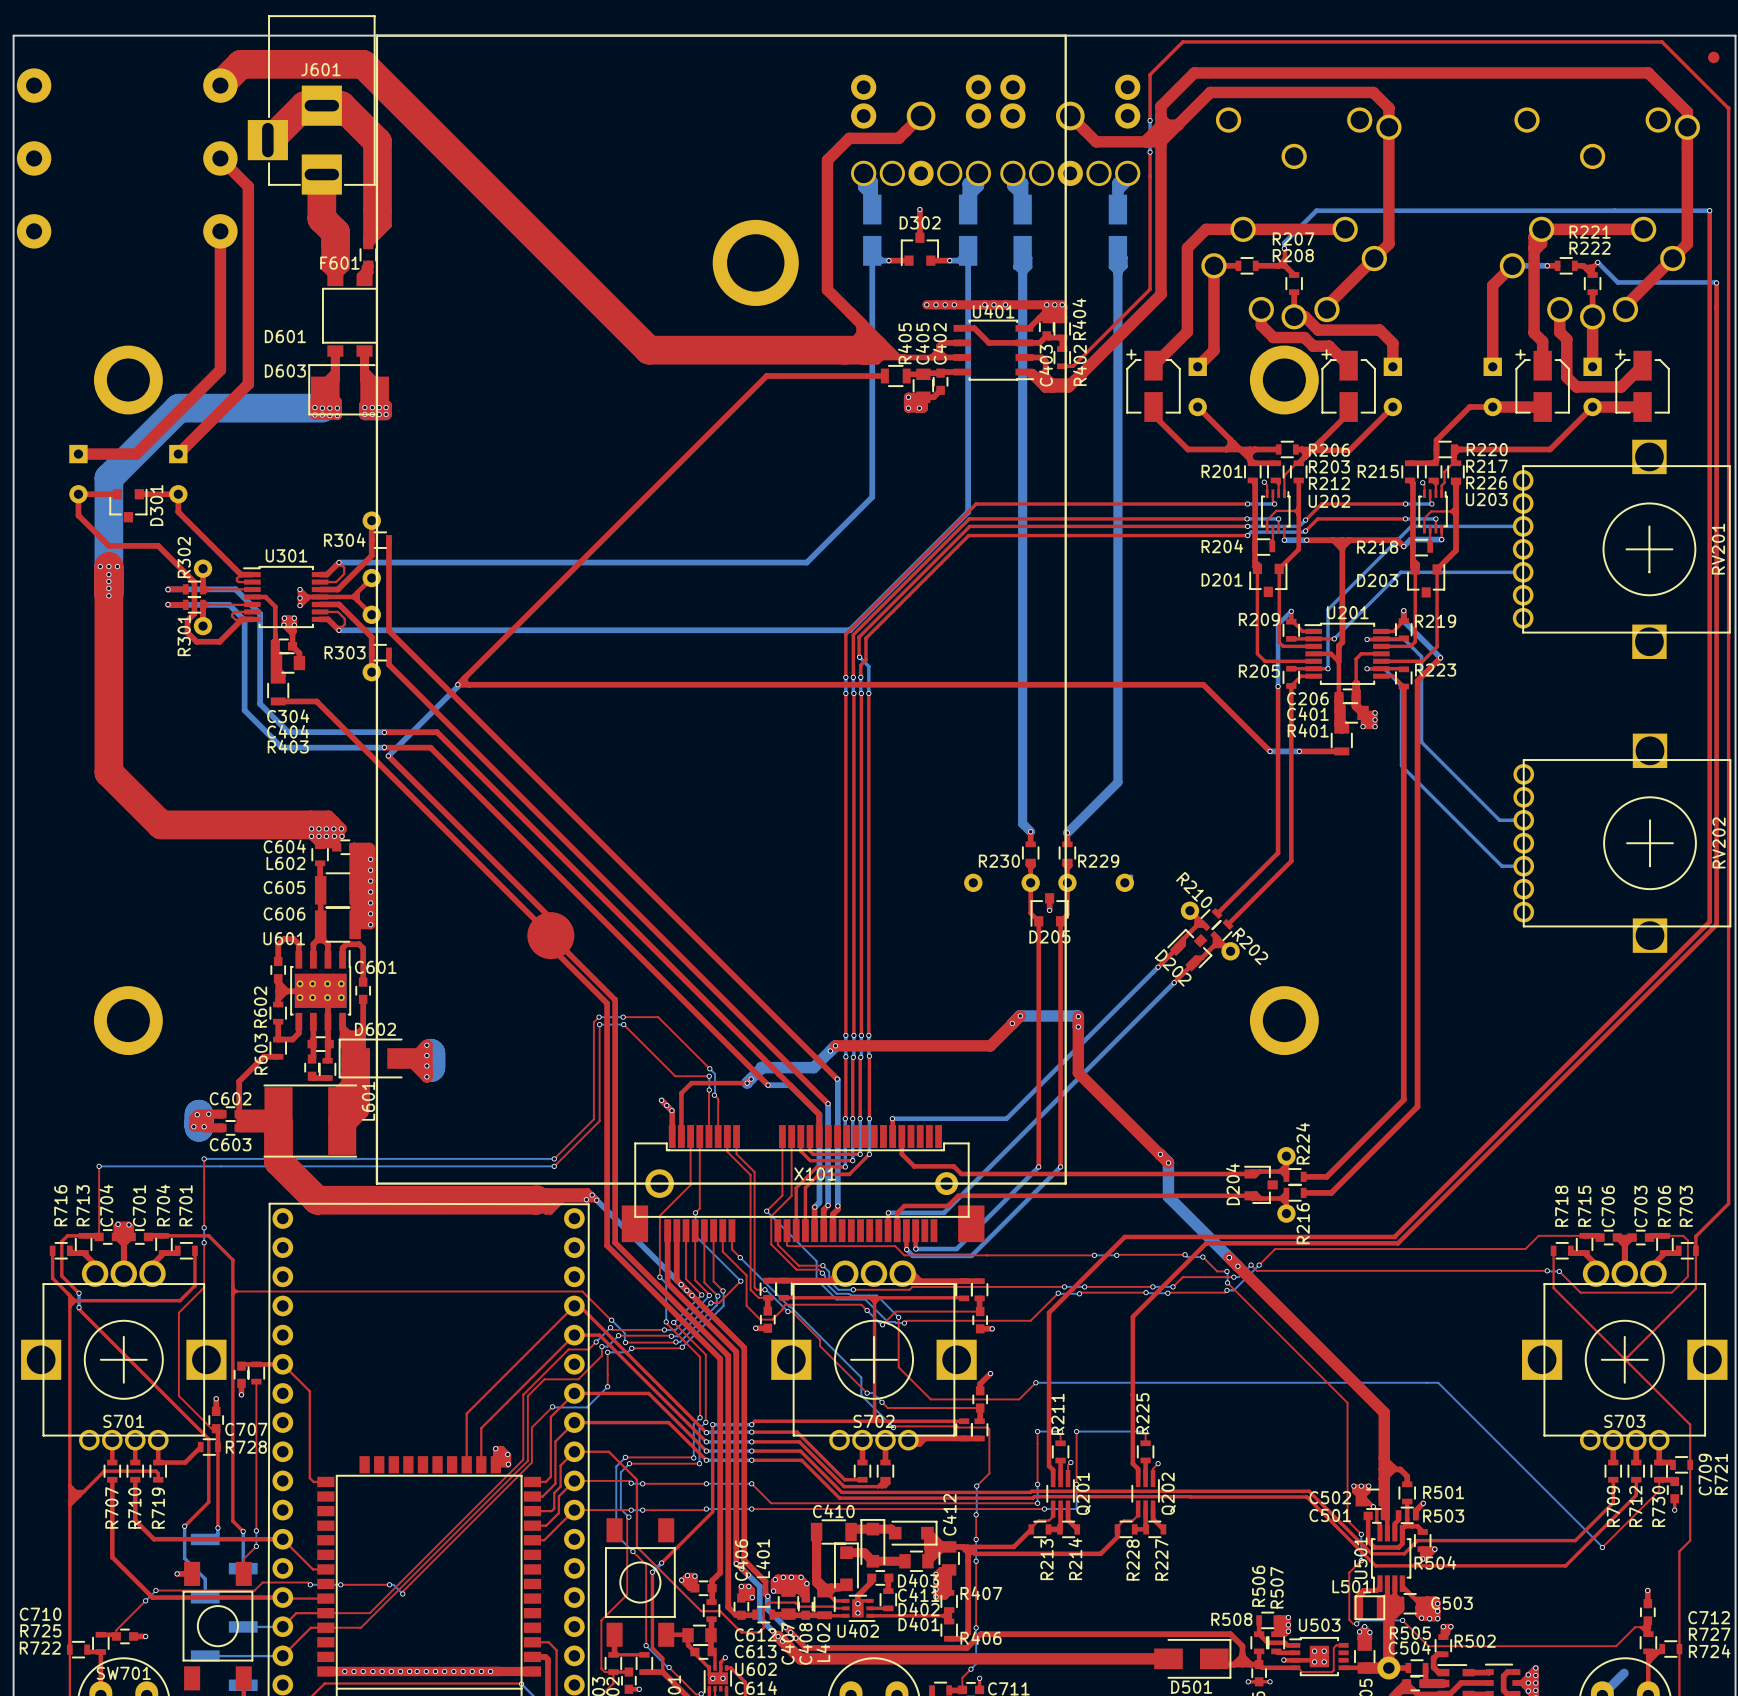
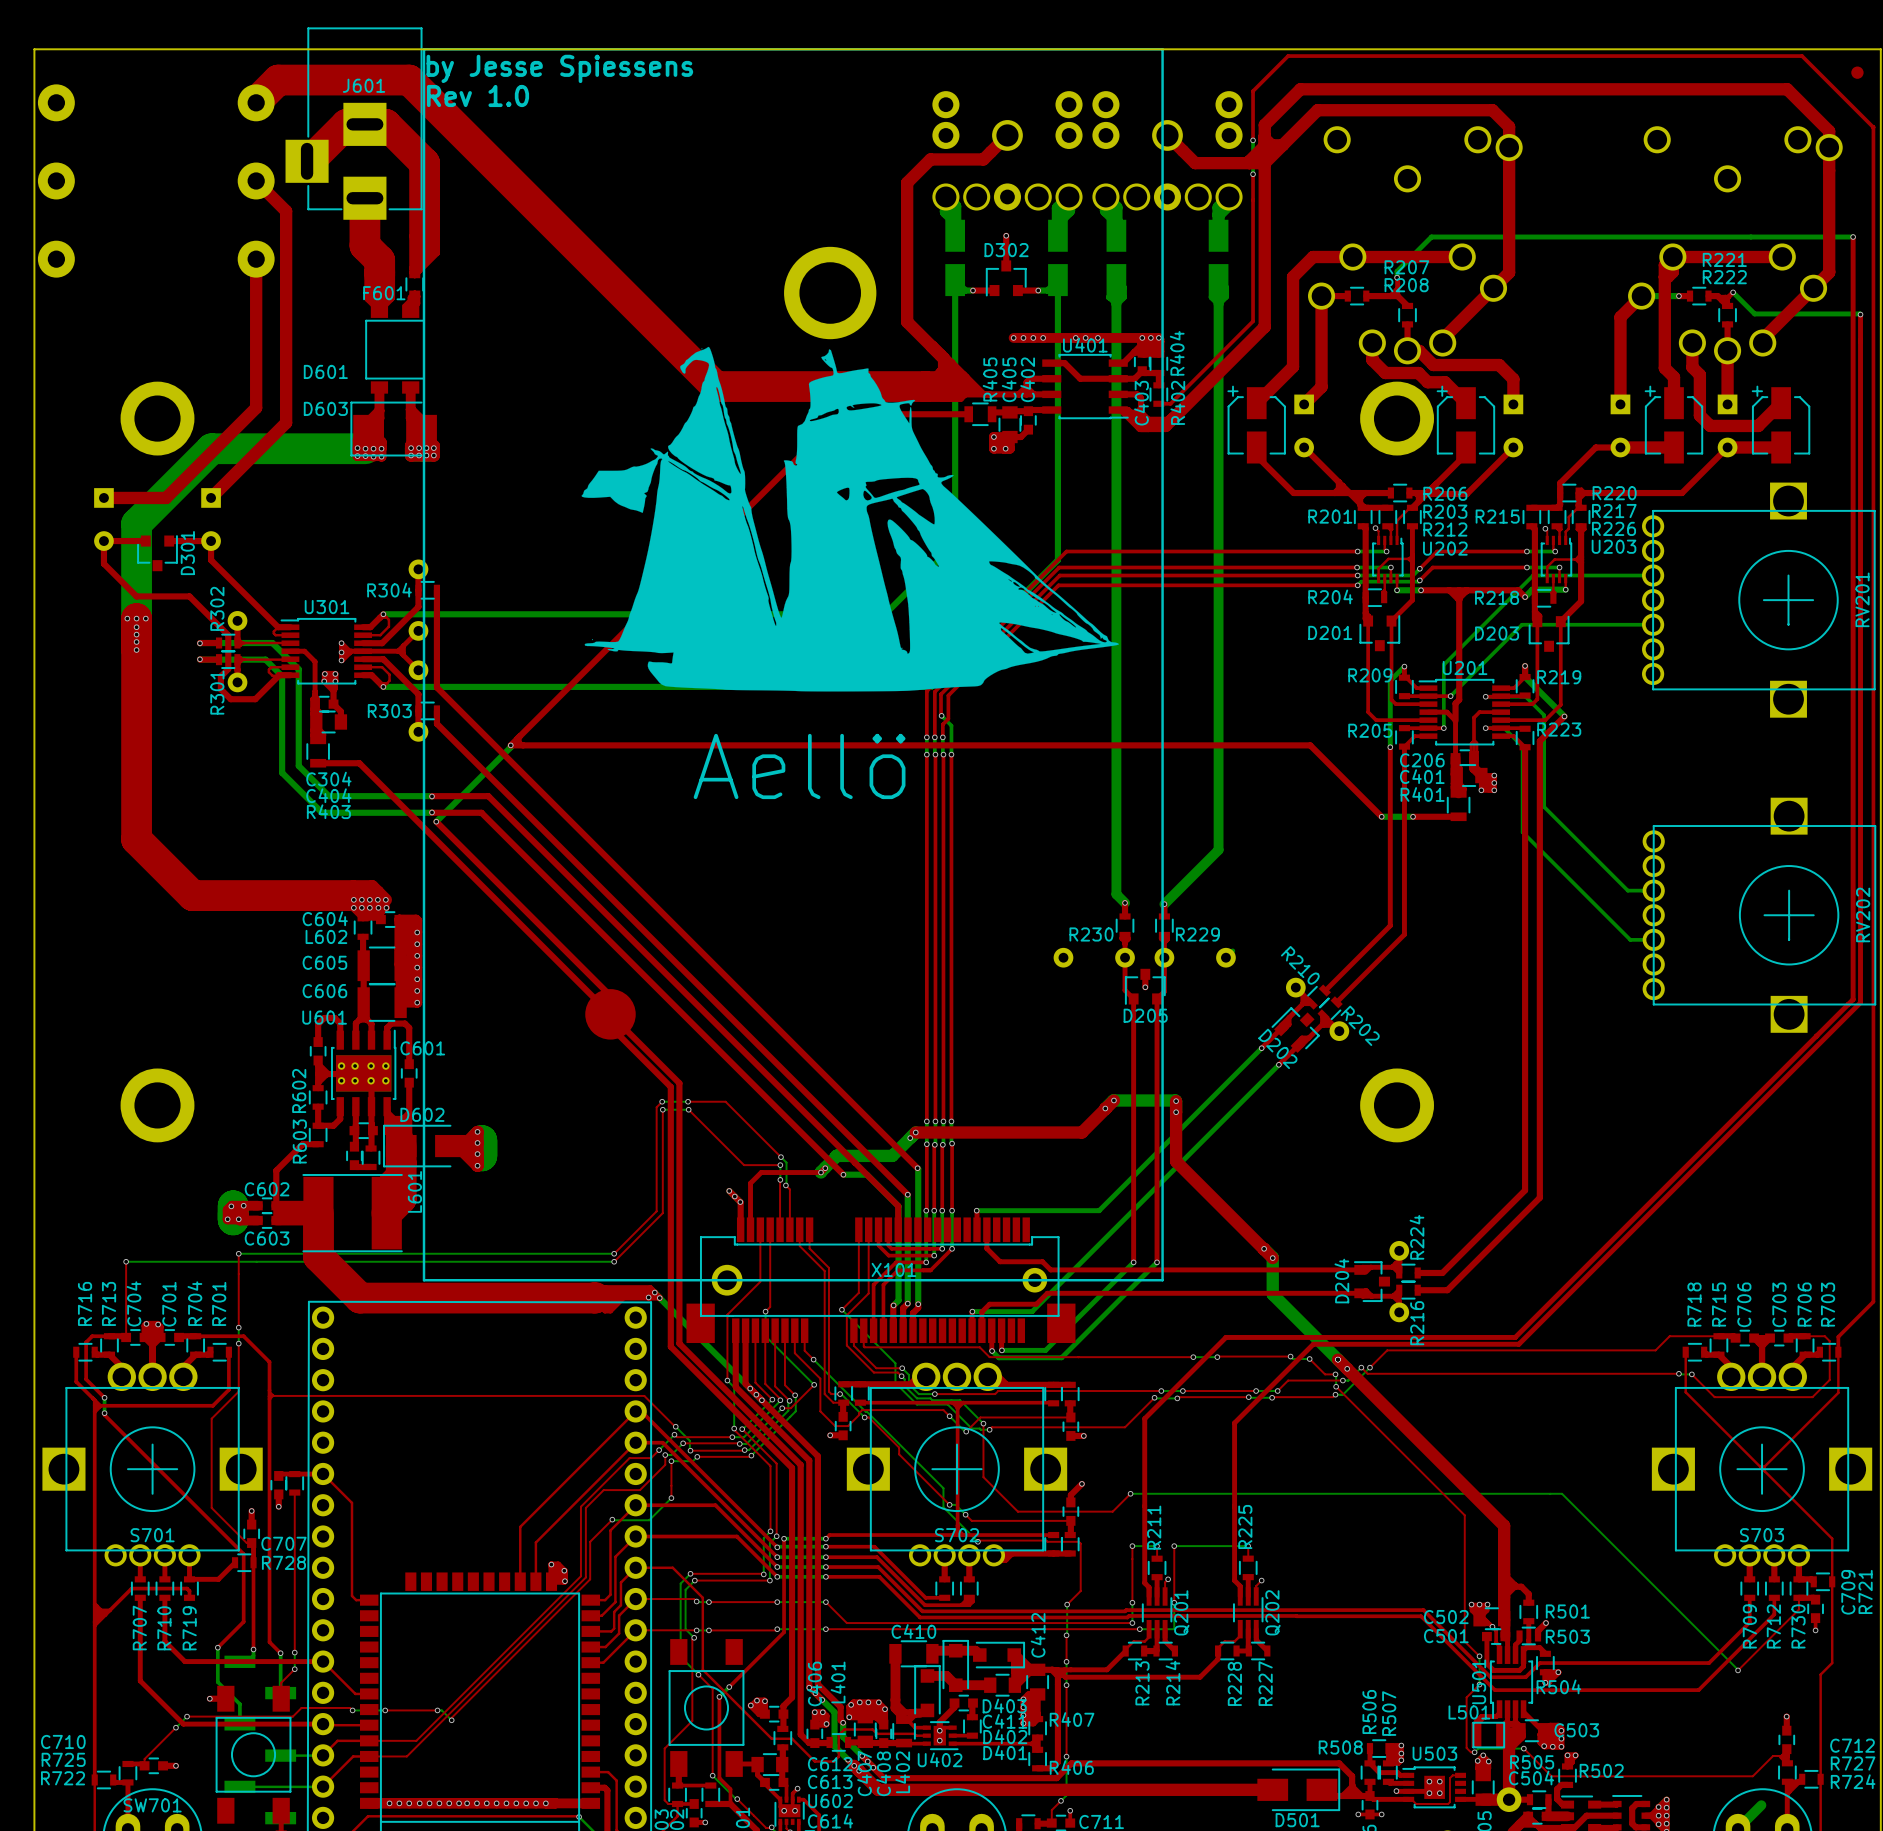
text: none -> by Jesse Spiessens (559, 68)
text: none -> Rev 1.0 (477, 95)
drawing: none -> [581, 346, 1119, 692]
text: none -> Aellö (799, 766)

